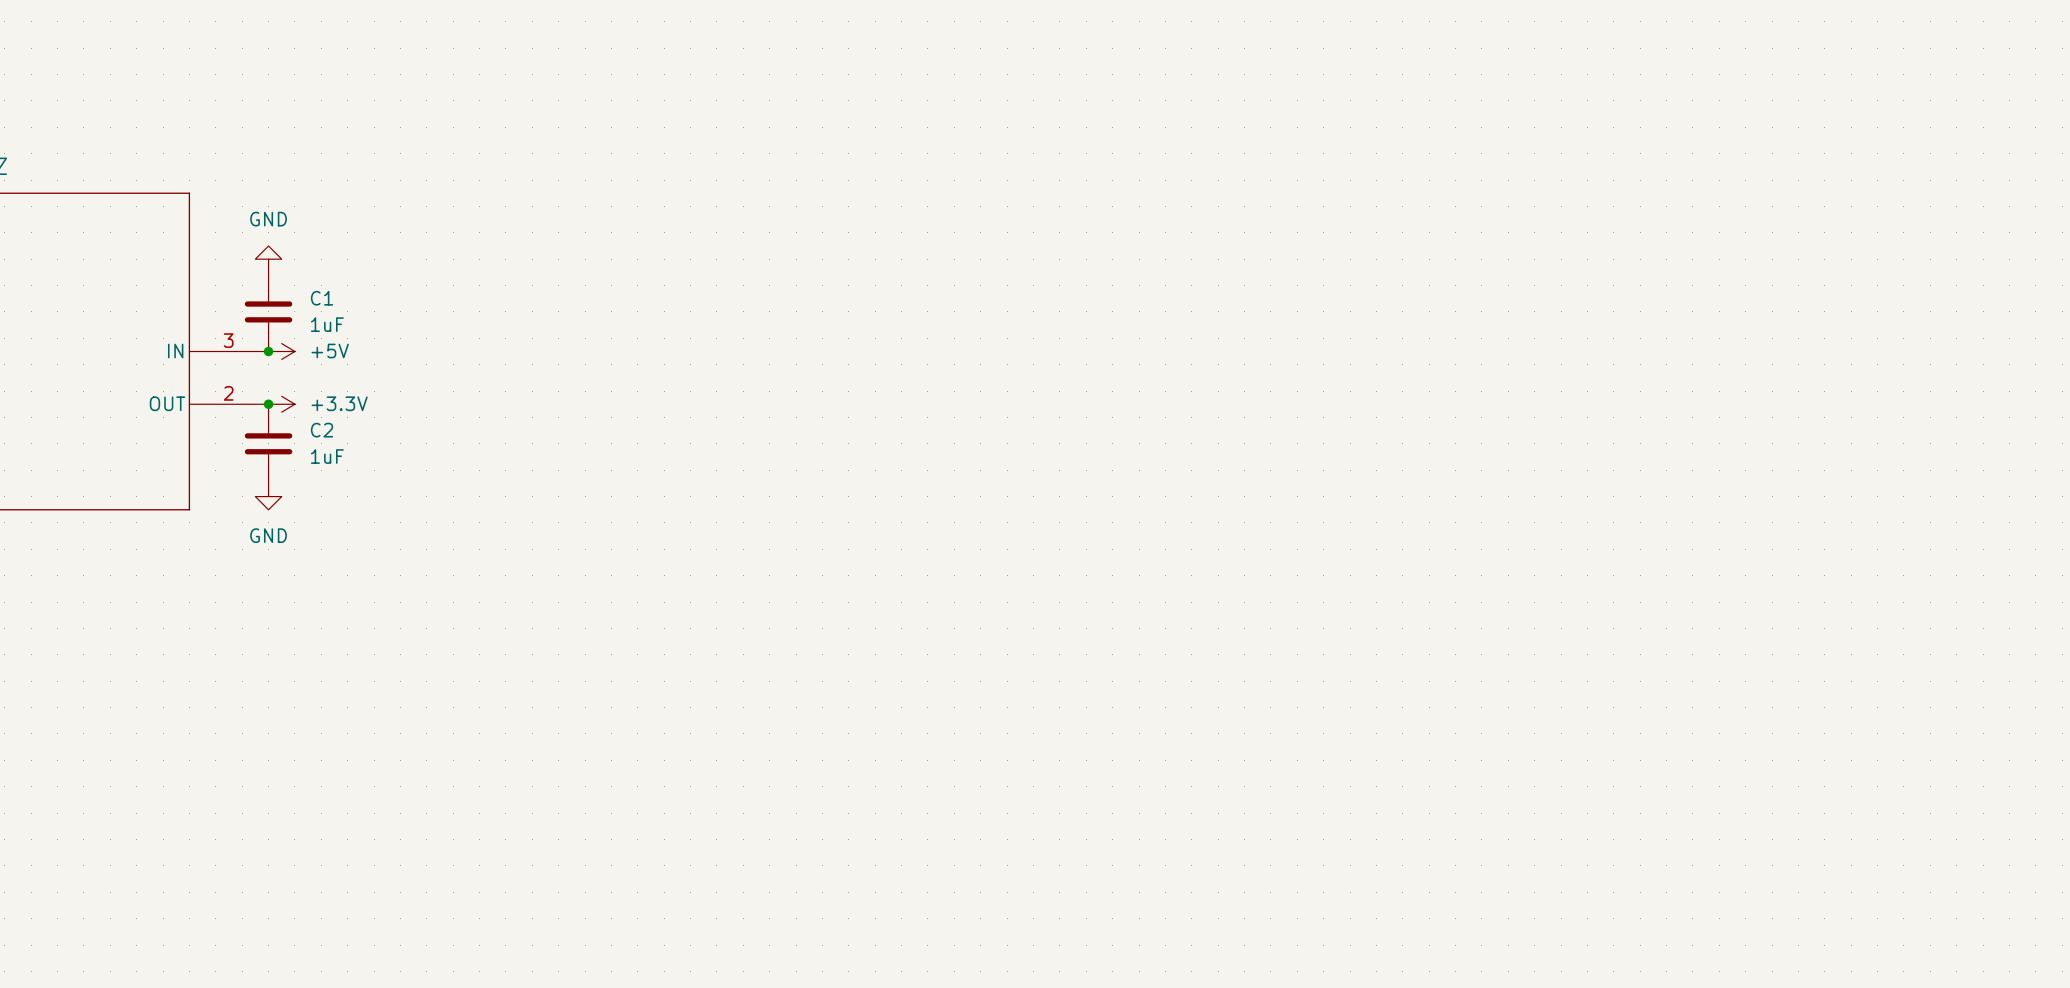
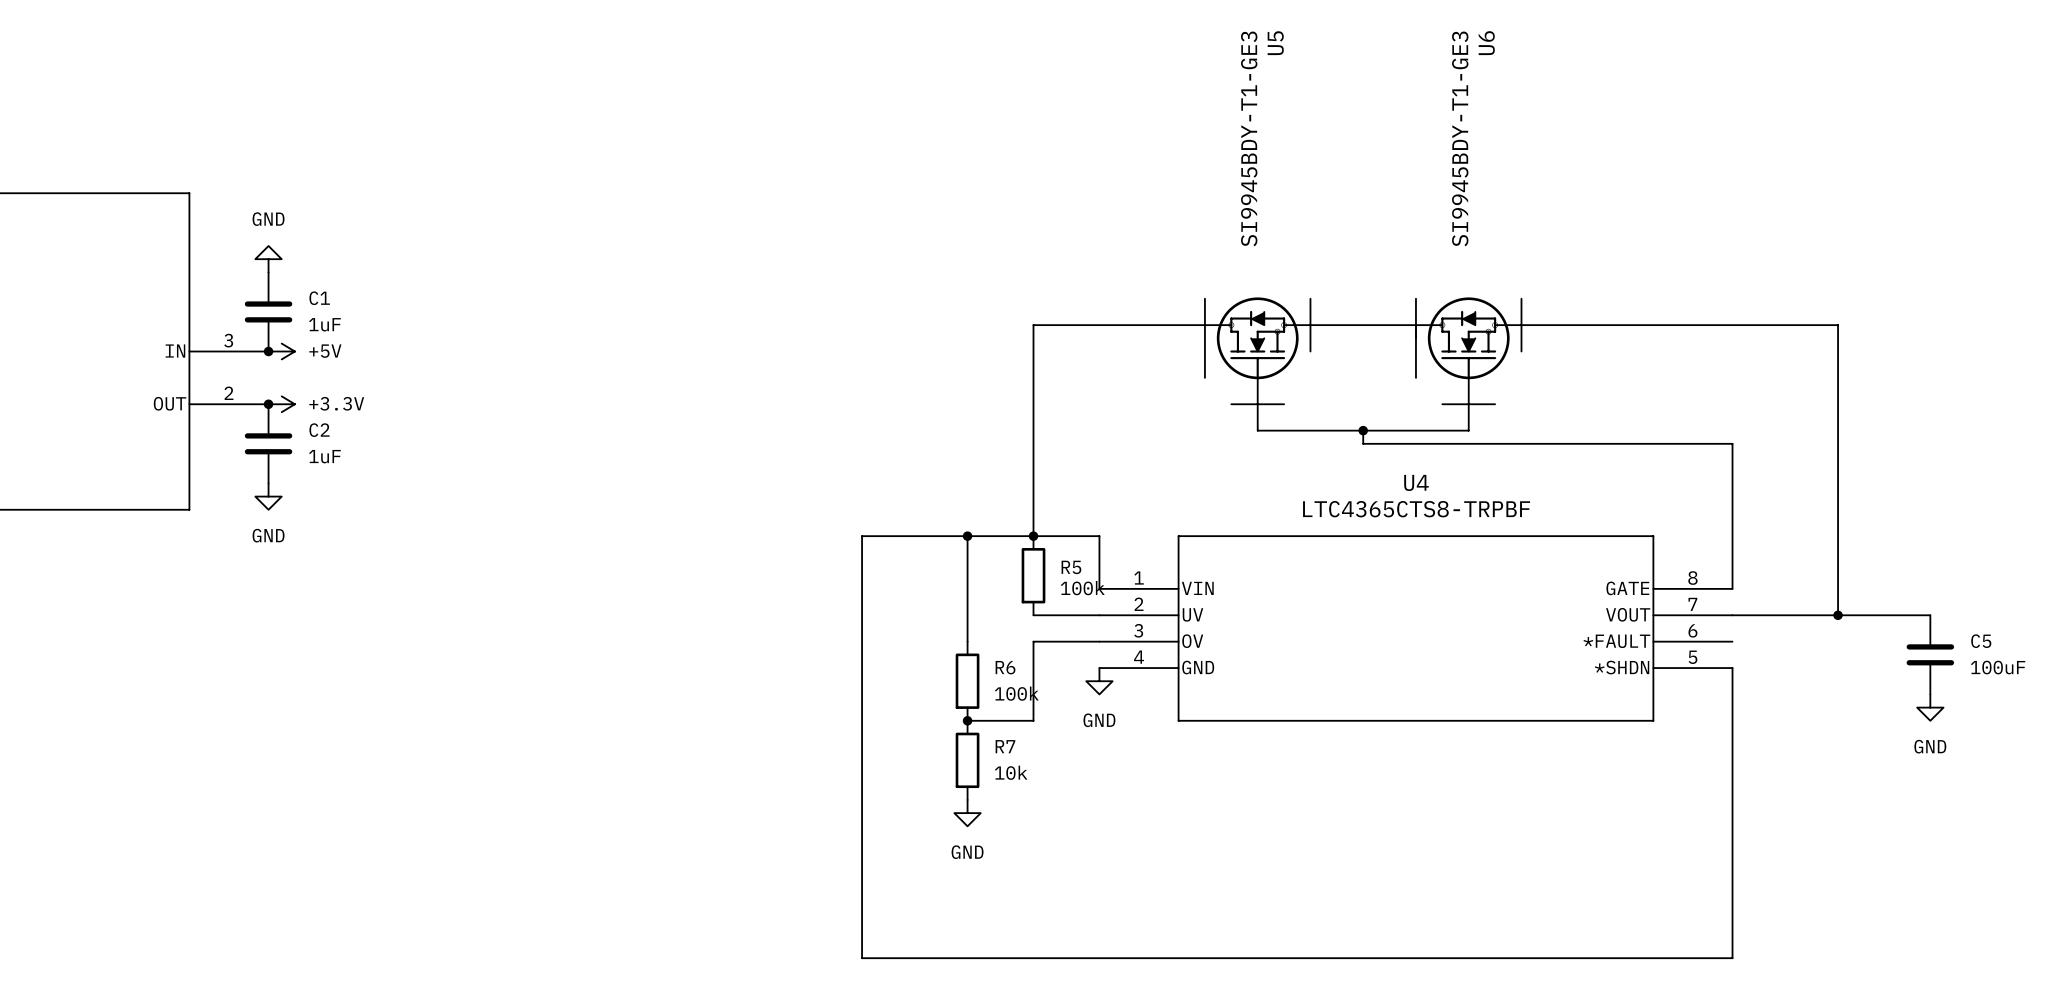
wire: none -> (1204, 325) (1033, 325) (1033, 536)
wire: none -> (1310, 325) (1415, 325) (1415, 338)
wire: none -> (1521, 325) (1838, 325) (1838, 615)
U5: none -> SI9945BDY-T1-GE3 (1257, 351)
U6: none -> SI9945BDY-T1-GE3 (1468, 351)
wire: none -> (1257, 404) (1257, 430) (1468, 430) (1468, 404)
wire: none -> (1363, 430) (1363, 443) (1732, 443) (1732, 588)
junction: none -> (1363, 430)
wire: none -> (967, 536) (967, 641)
junction: none -> (967, 536)
junction: none -> (1033, 536)
R5: none -> 100k (1033, 575)
wire: none -> (1099, 588) (1099, 536) (862, 536) (862, 958) (1732, 958) (1732, 668)
wire: none -> (1033, 615) (1099, 615)
wire: none -> (1732, 615) (1930, 615)
junction: none -> (1838, 615)
U4: none -> LTC4365CTS8-TRPBF (1415, 628)
wire: none -> (1099, 641) (1033, 641) (1033, 720) (967, 720)
C5: none -> 100uF (1930, 654)
R6: none -> 100k (967, 681)
power symbol: none -> GND (1099, 681)
power symbol: none -> GND (1930, 707)
junction: none -> (967, 720)
R7: none -> 10k (967, 760)
power symbol: none -> GND (967, 813)

